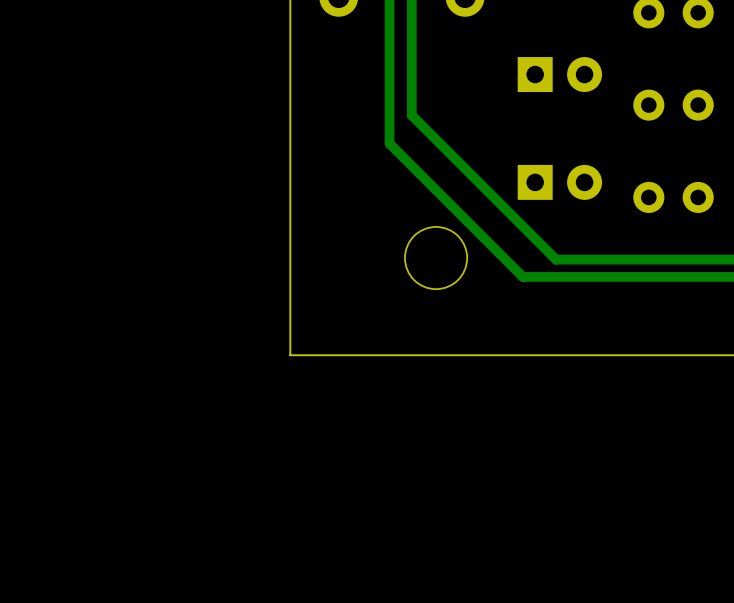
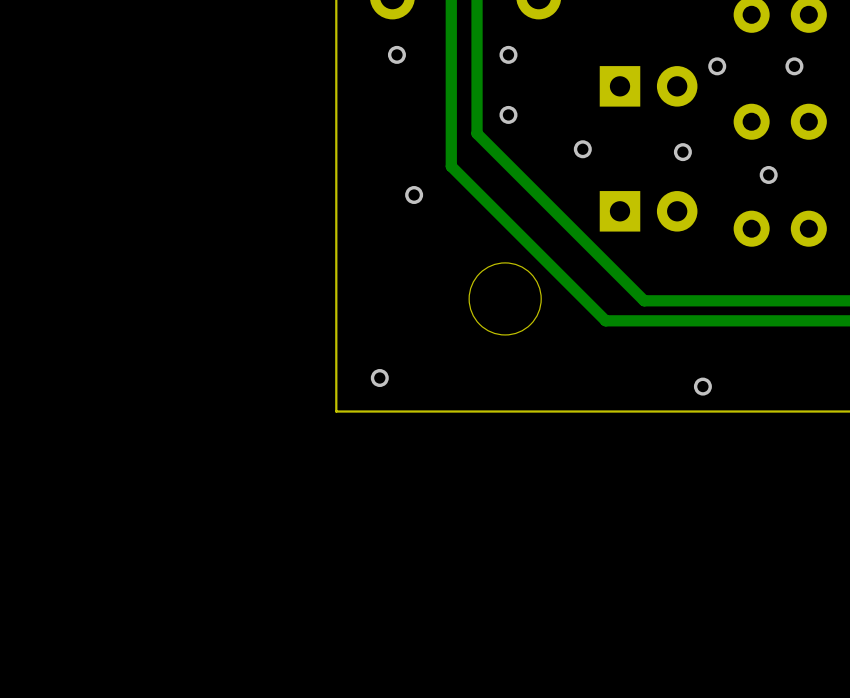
via: none -> (396, 54)
via: none -> (508, 54)
via: none -> (717, 66)
via: none -> (794, 66)
via: none -> (508, 114)
via: none -> (582, 149)
via: none -> (682, 152)
via: none -> (768, 174)
via: none -> (414, 195)
via: none -> (379, 378)
via: none -> (702, 386)

